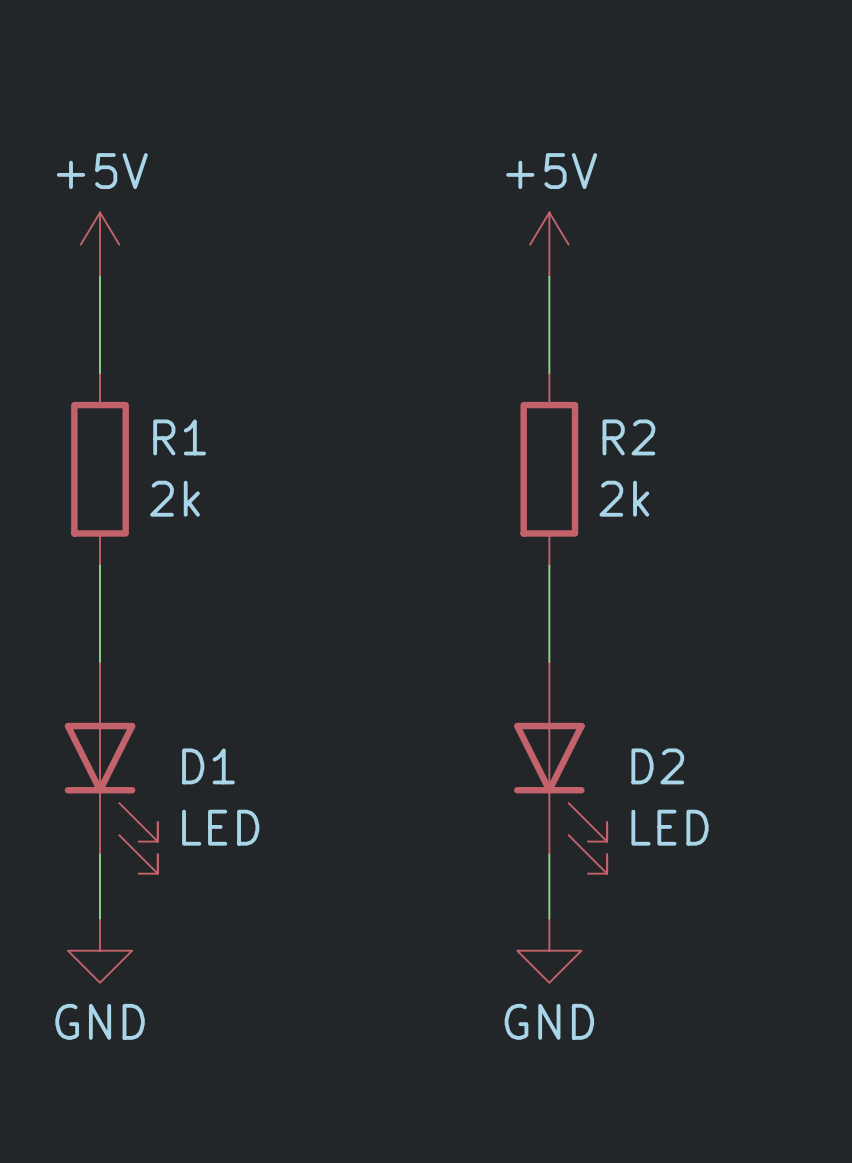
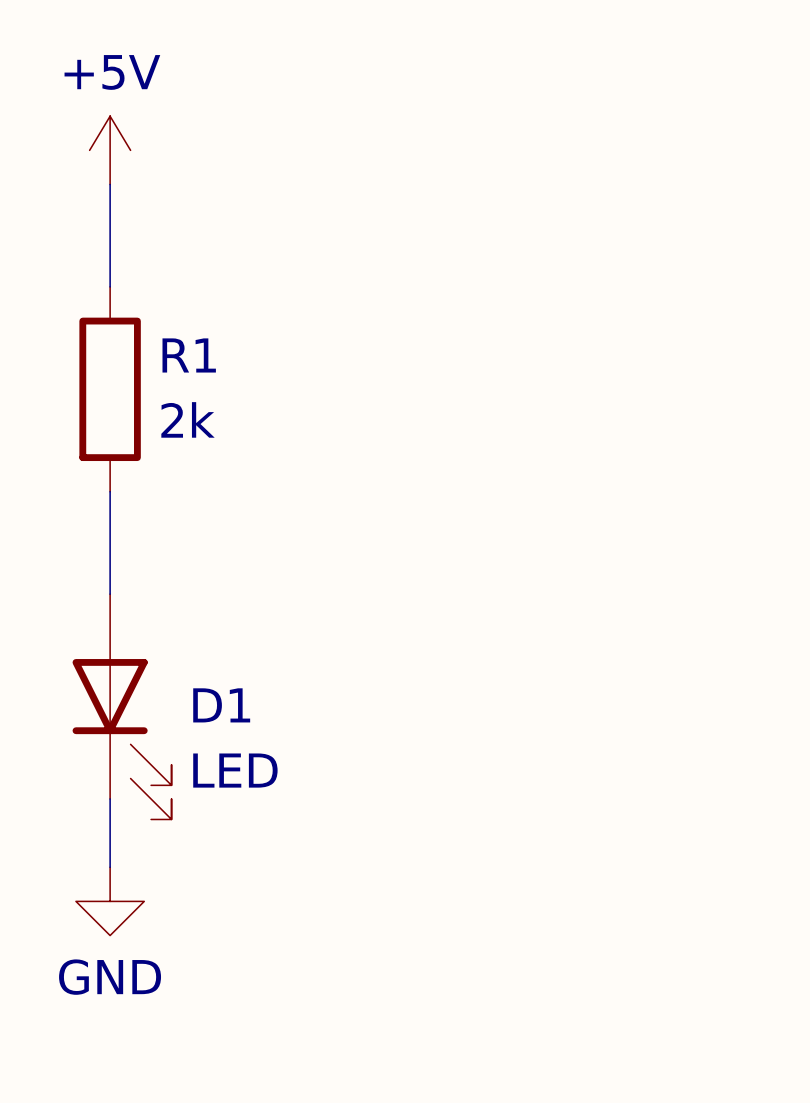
power symbol: +5V (549, 244) -> none
wire: (549, 276) (549, 373) -> none
R2: 2k (549, 469) -> none
wire: (549, 565) (549, 661) -> none
D2: LED (560, 767) -> none
wire: (549, 854) (549, 918) -> none
power symbol: GND (549, 950) -> none

